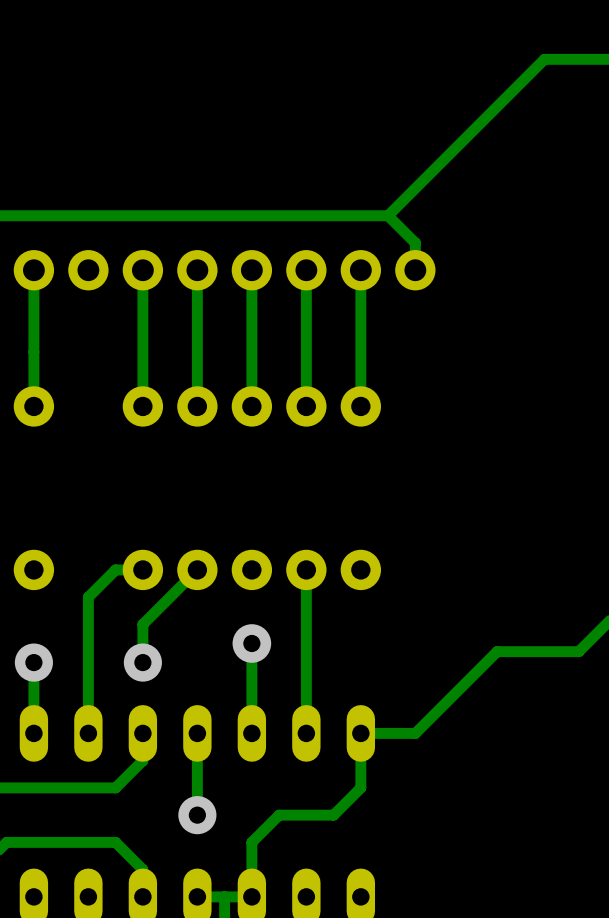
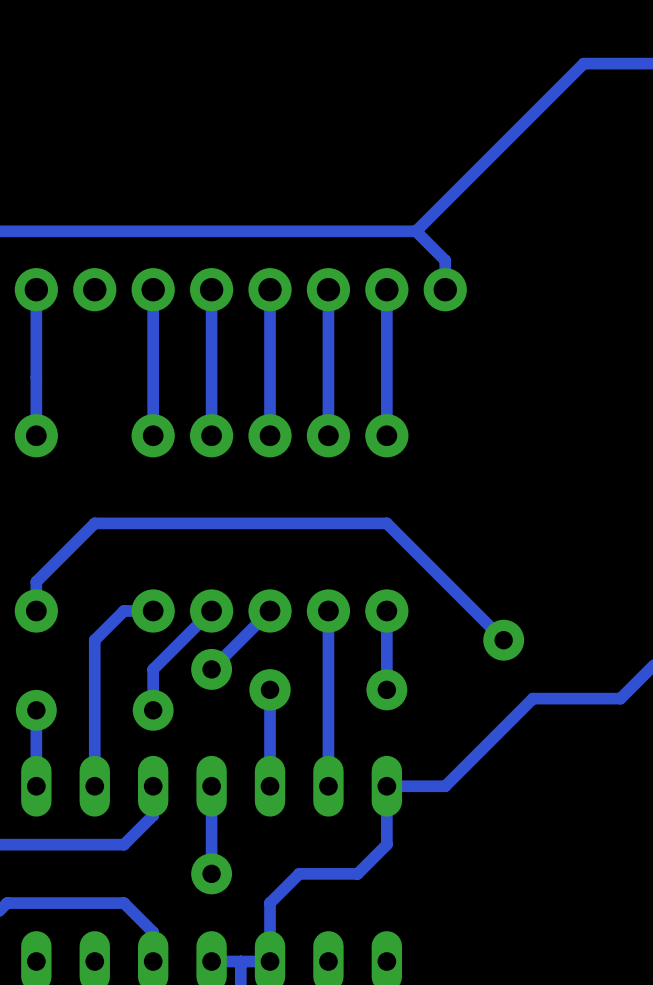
track: none -> (36, 610) (36, 581) (94, 523) (386, 523) (503, 640)
track: none -> (270, 610) (211, 669)
track: none -> (386, 610) (386, 689)
via: none -> (503, 640)
via: none -> (211, 669)
via: none -> (386, 689)

